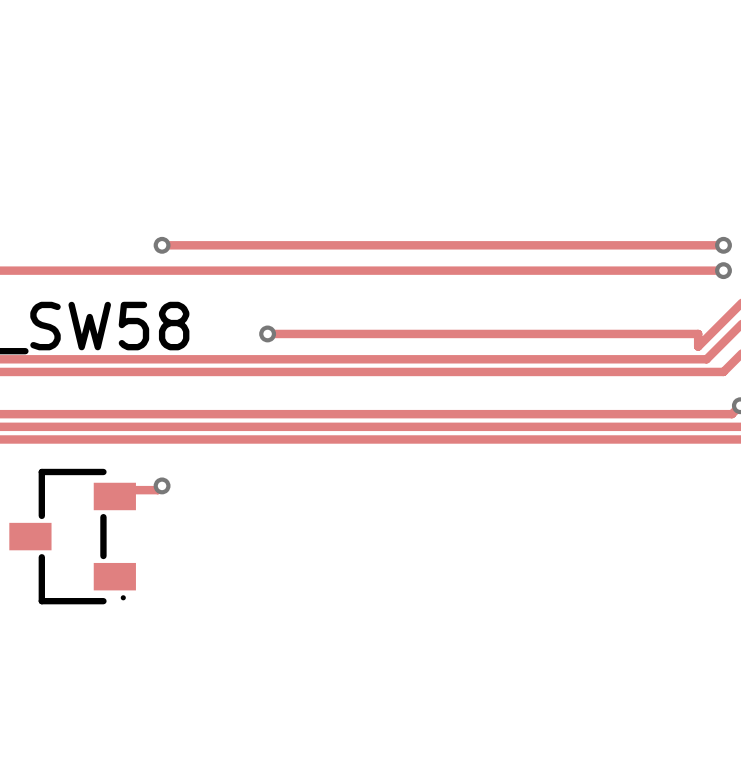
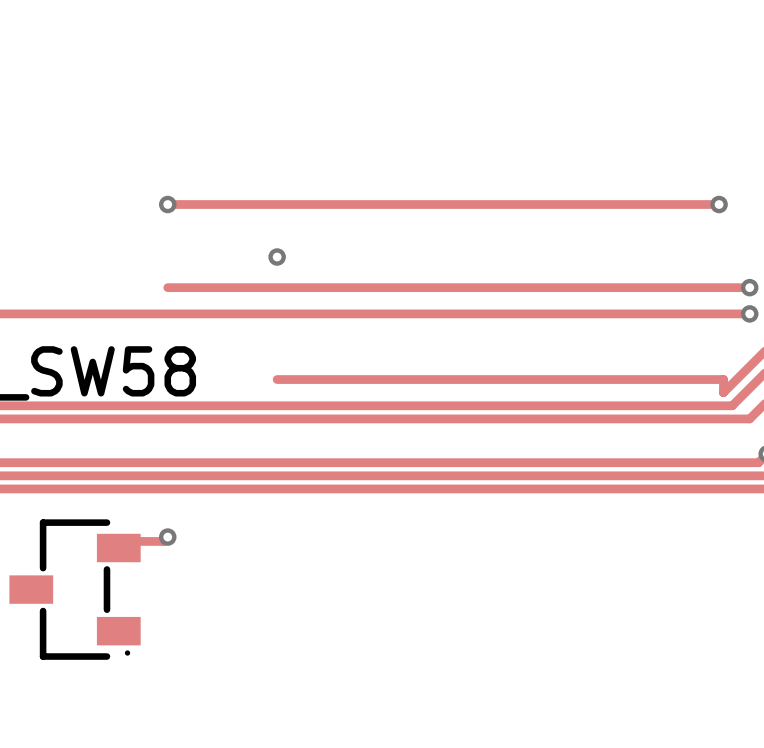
track: none -> (167, 204) (719, 204)
via: none -> (167, 204)
via: none -> (719, 204)
via: none -> (277, 257)
via: (162, 245) -> none
via: (267, 333) -> none

